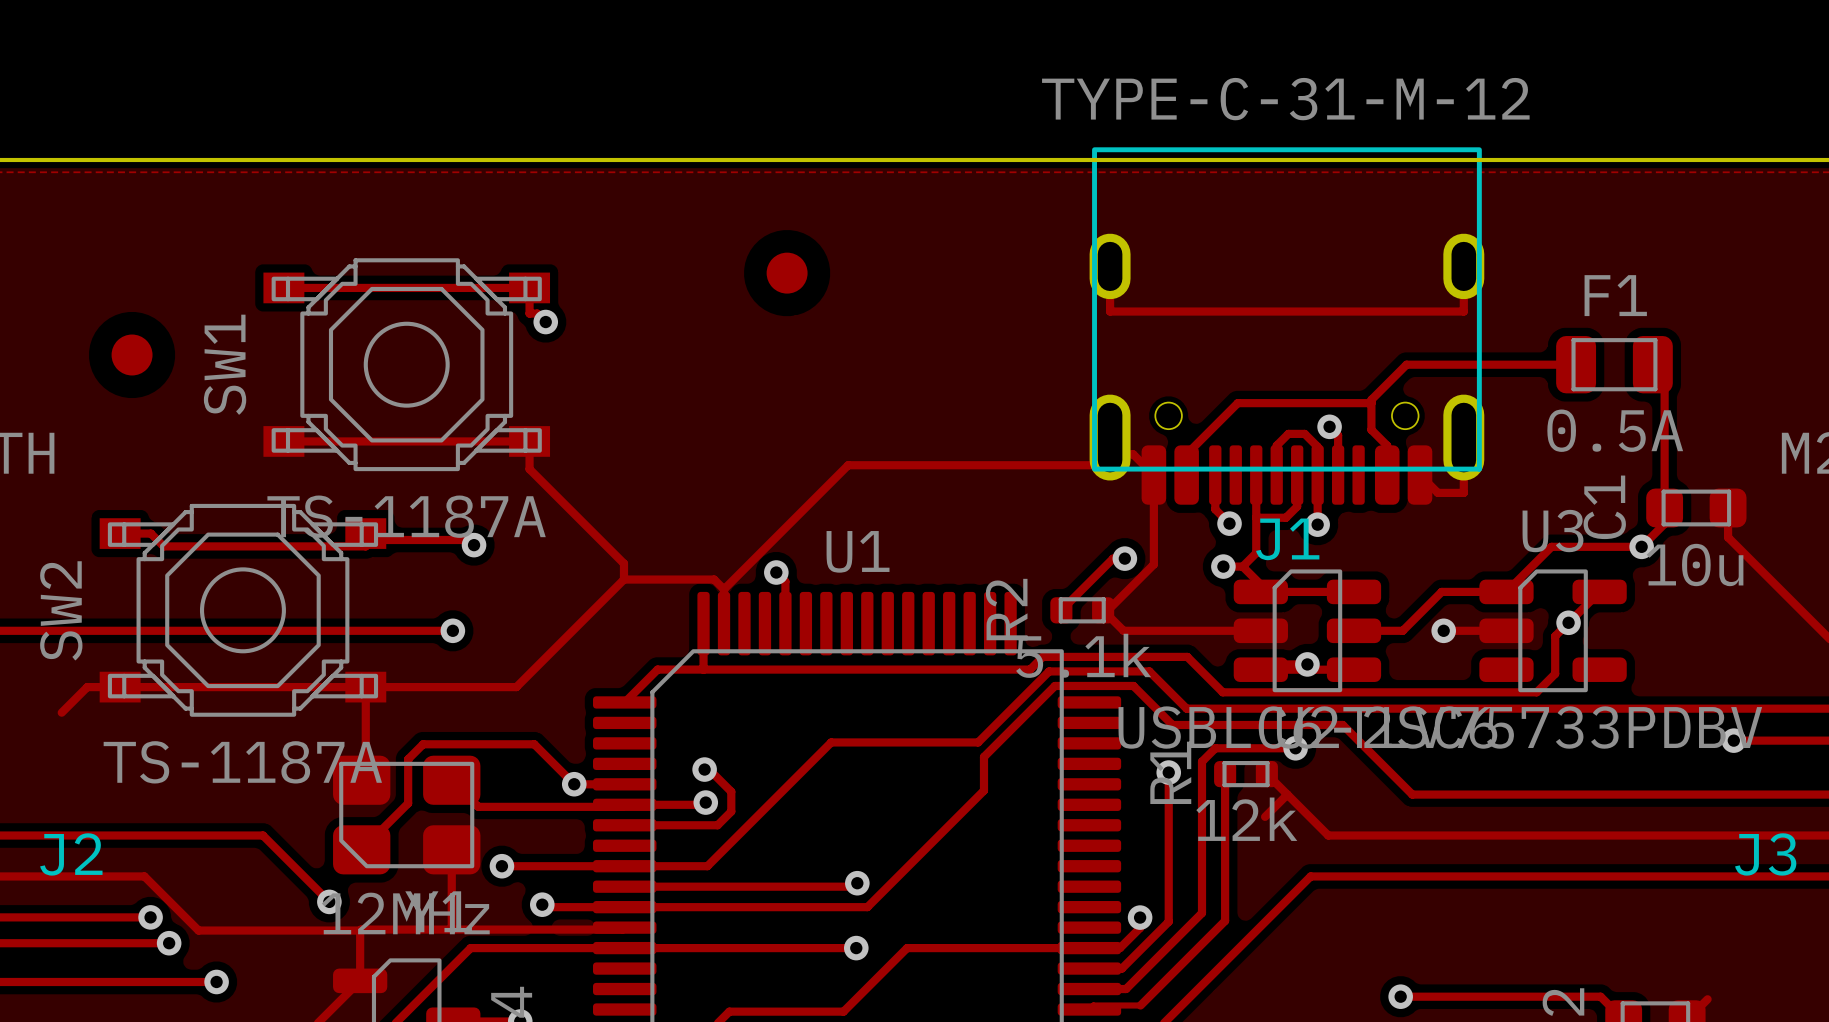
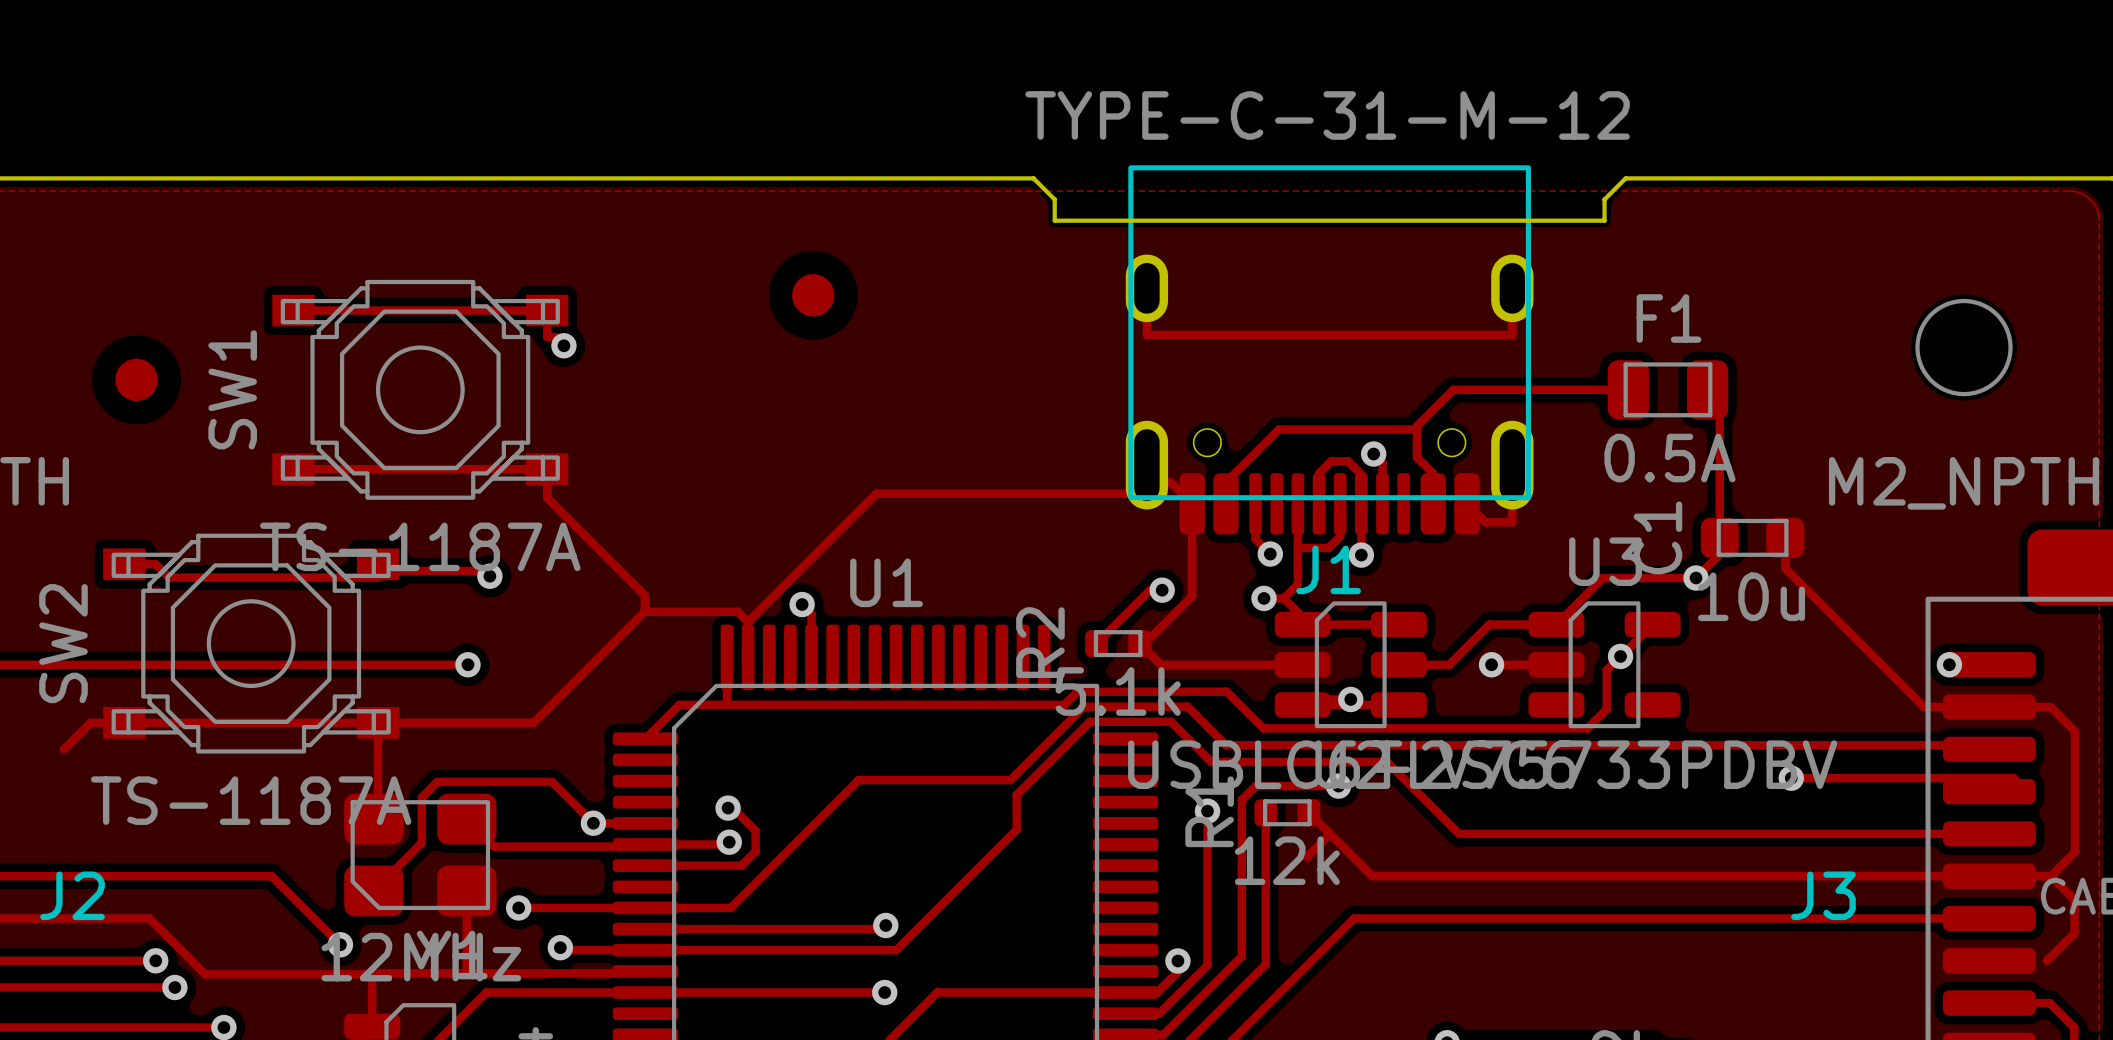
board edge: (1000, 159) (1573, 159) -> (1033, 178) (1054, 199) (1054, 220) (1604, 220) (1604, 199) (1625, 178)

